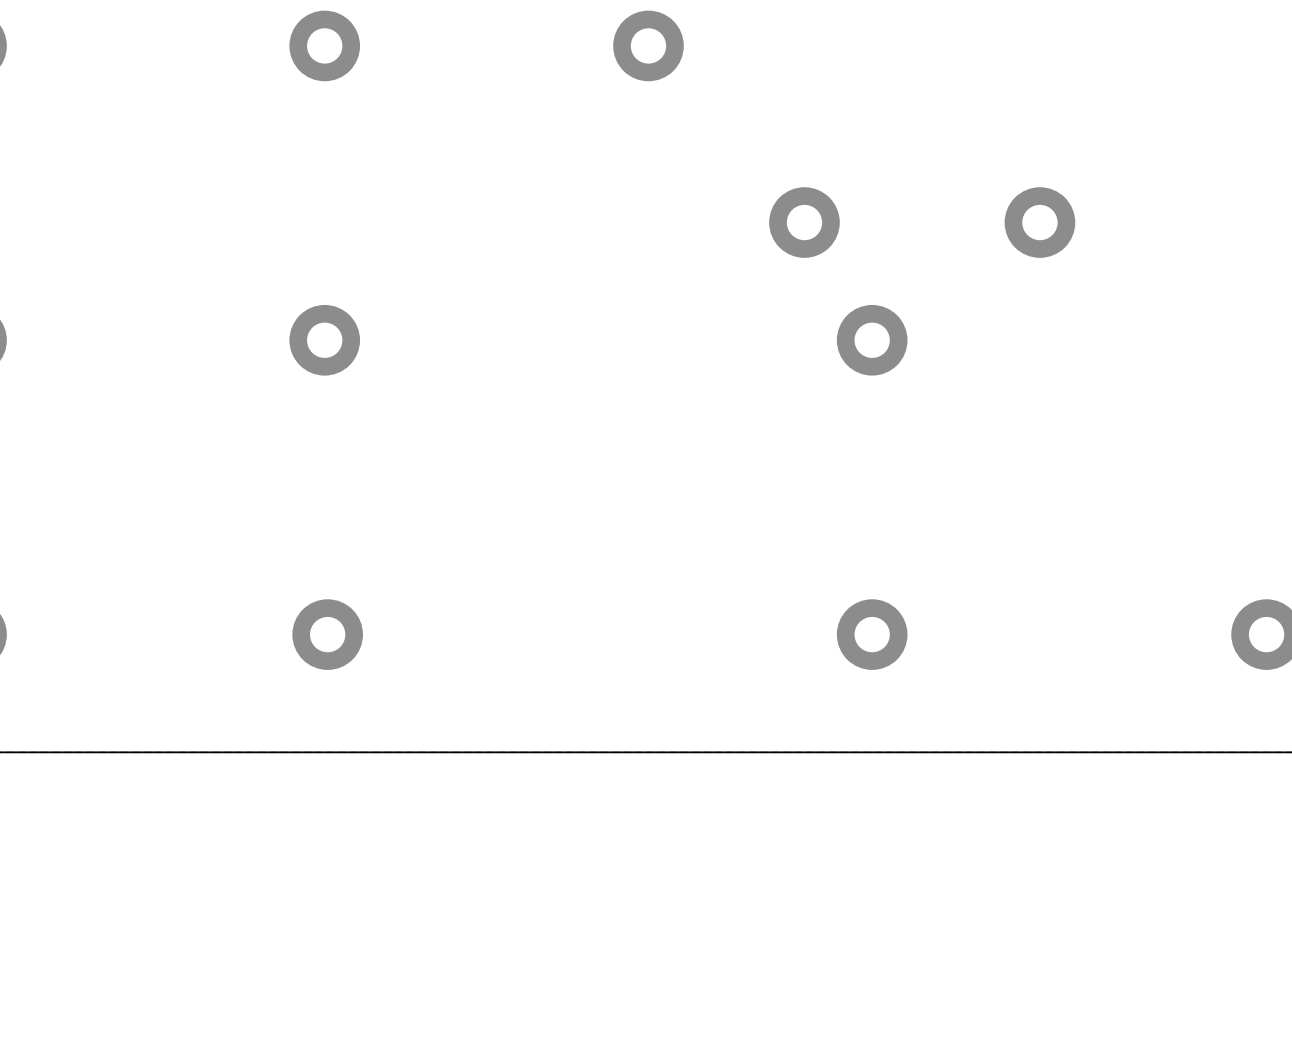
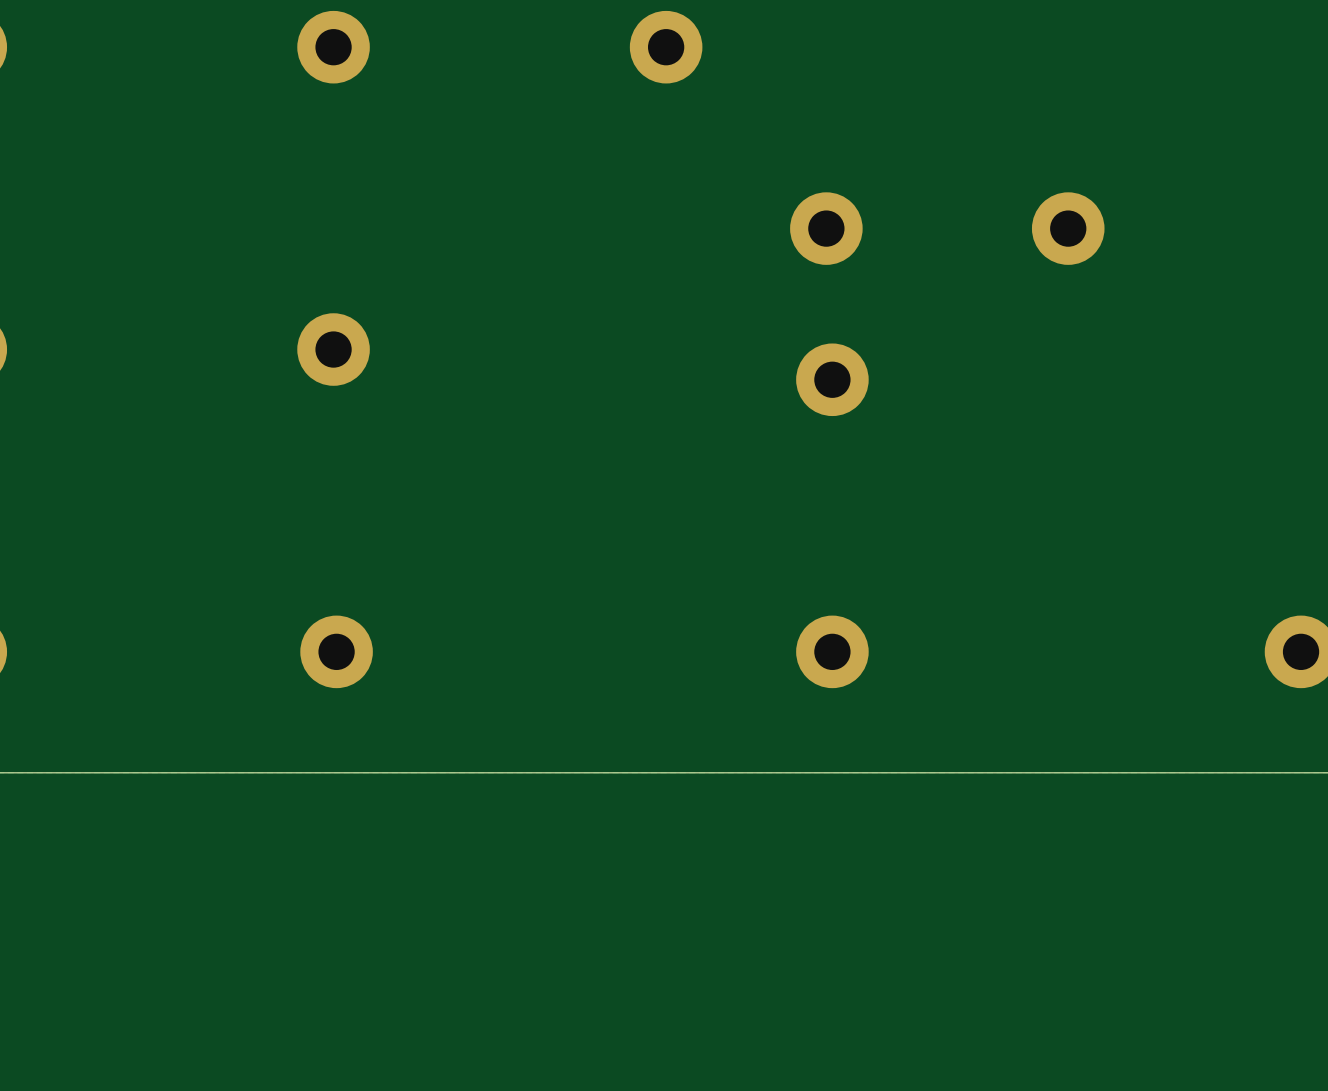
via position: (872, 340) -> (832, 379)
via position: (872, 634) -> (832, 651)

